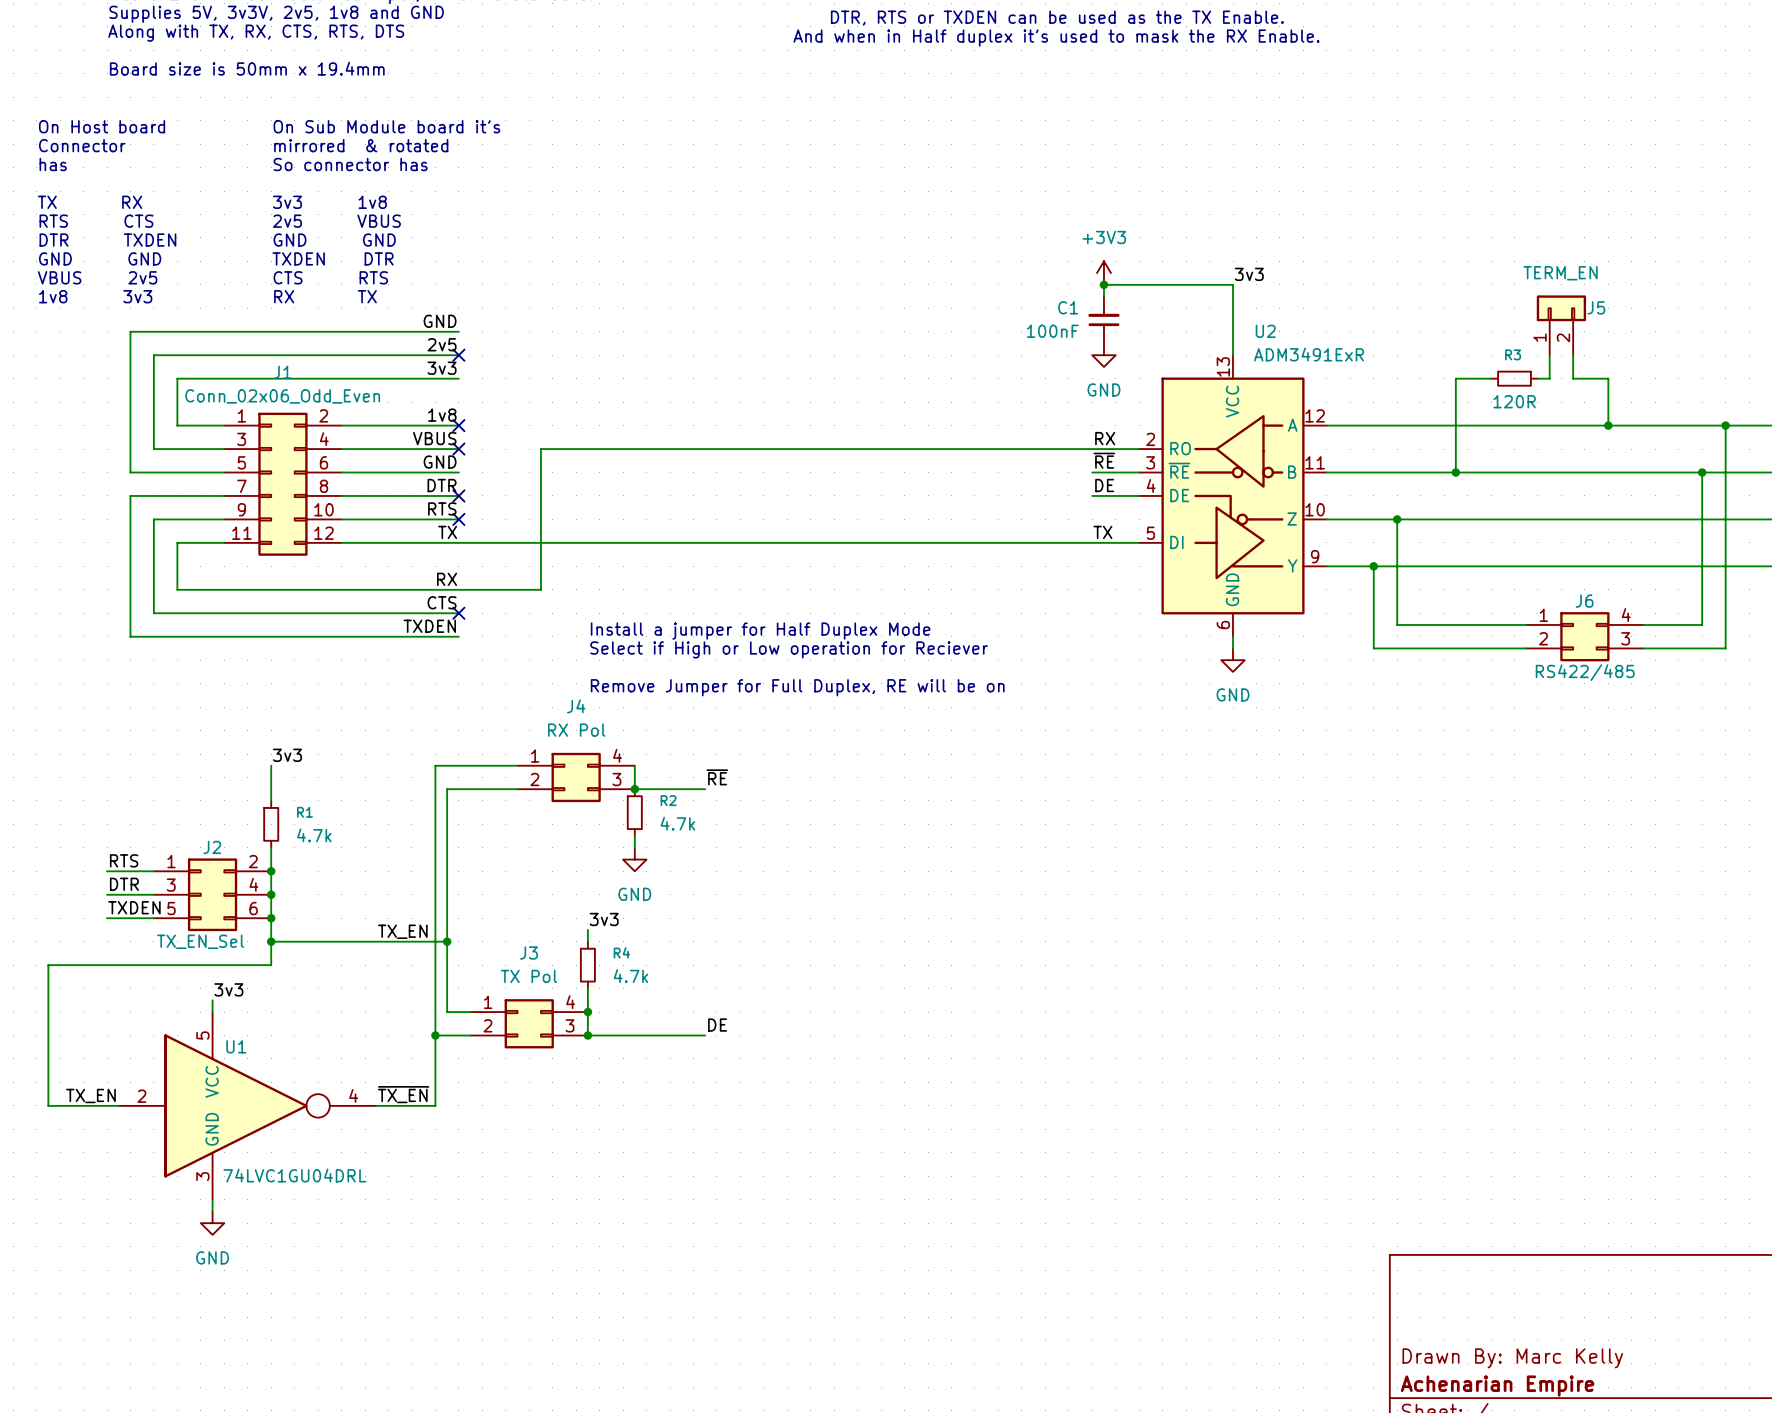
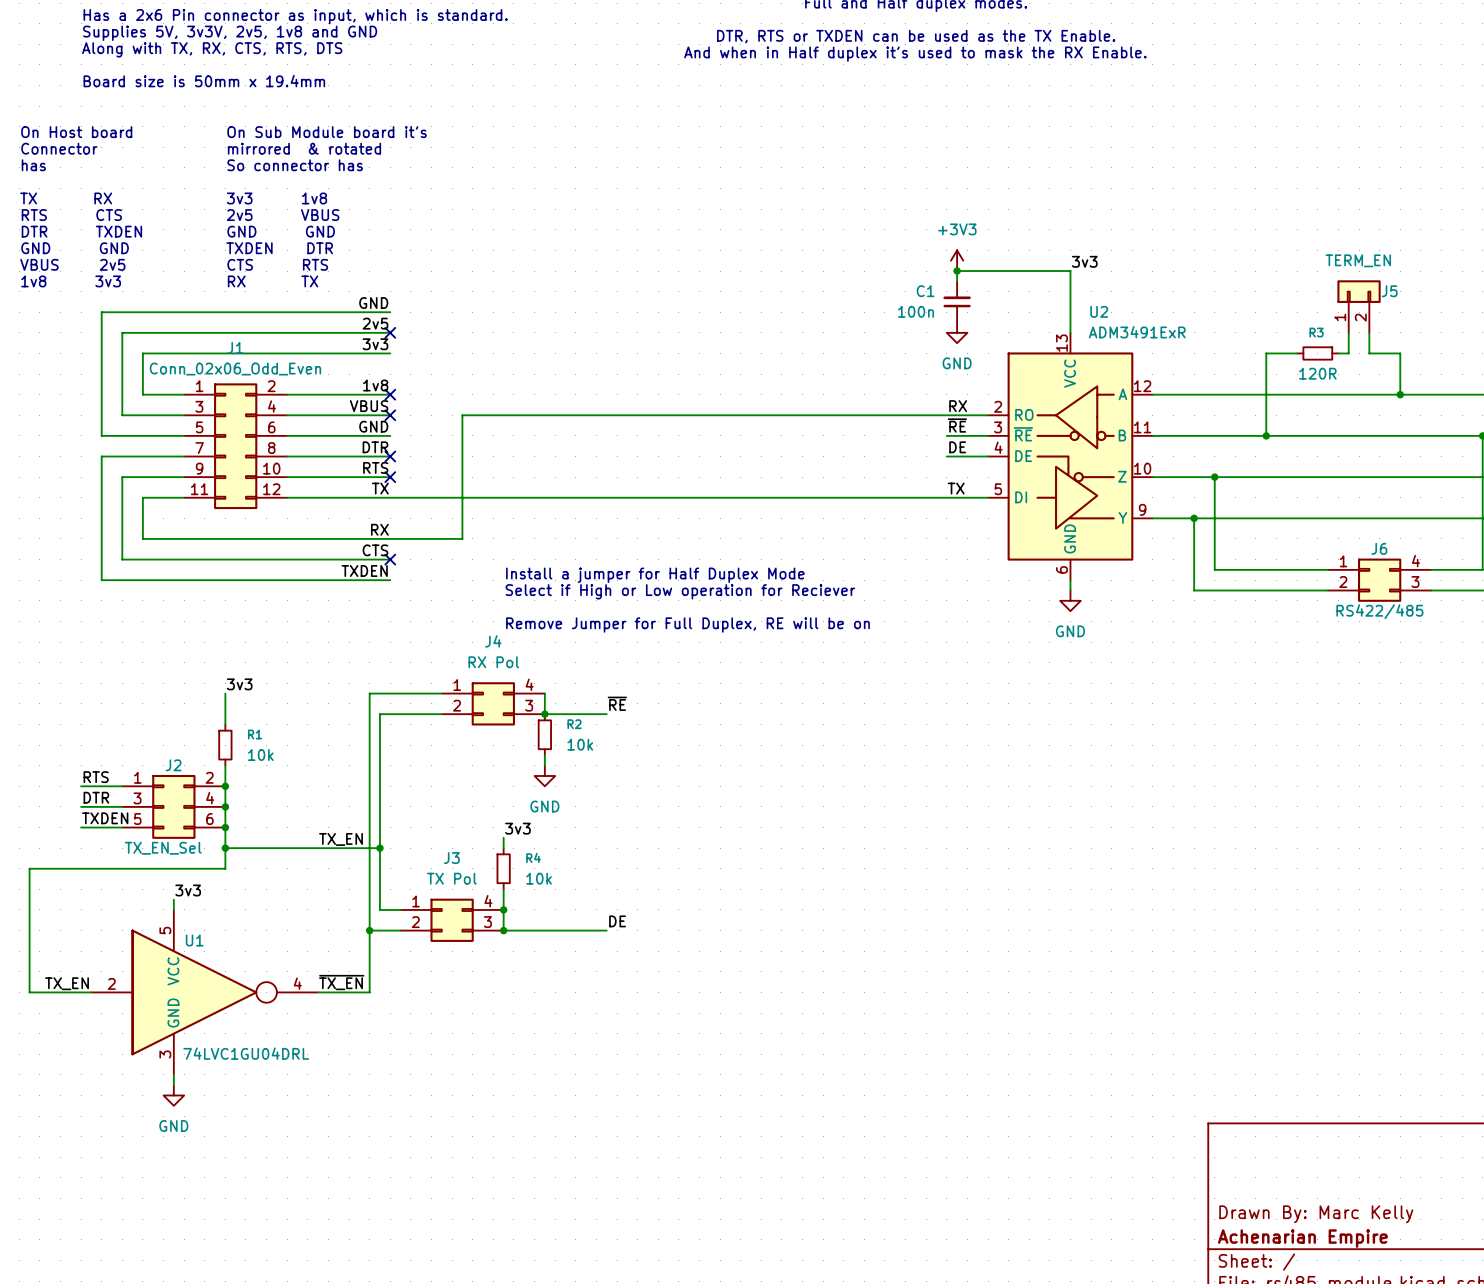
C1 value: 100nF (1052, 331) -> 100n (916, 311)
R2 value: 4.7k (677, 823) -> 10k (580, 744)
R1 value: 4.7k (314, 835) -> 10k (260, 755)
R4 value: 4.7k (630, 976) -> 10k (539, 878)

